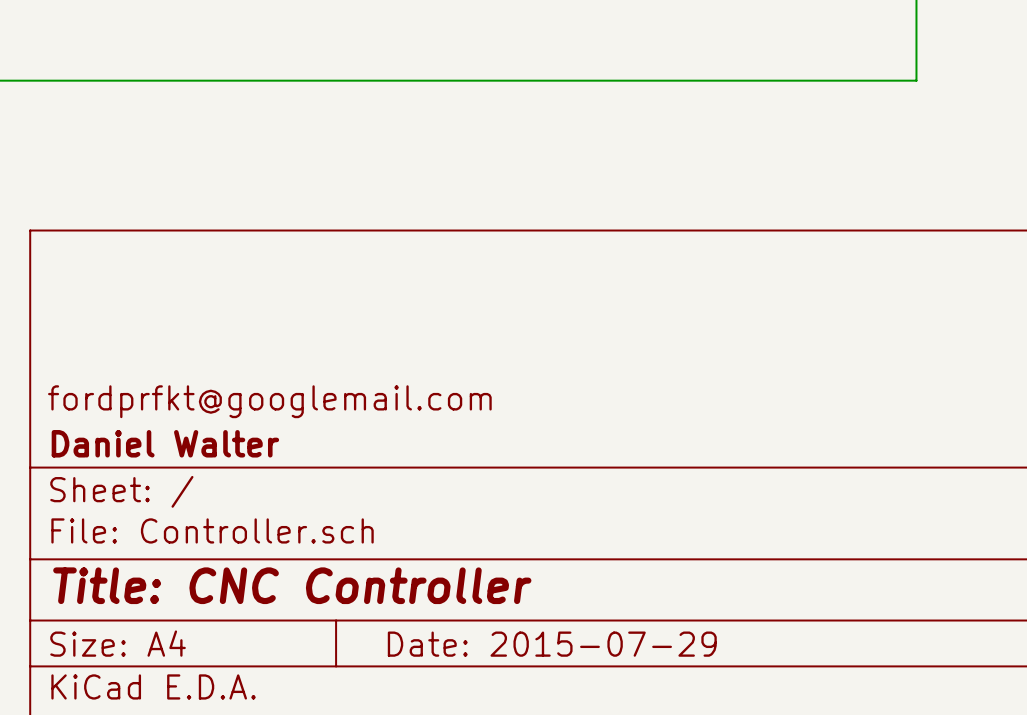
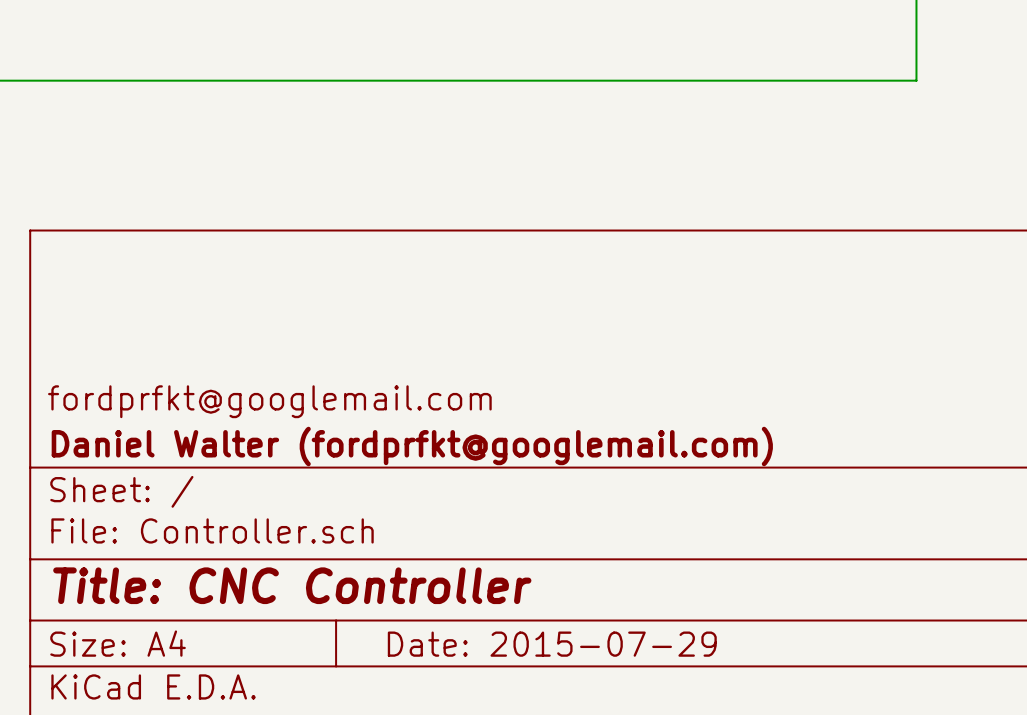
title block: Daniel Walter (165, 443) -> Daniel Walter (fordprfkt@googlemail.com) (412, 446)

